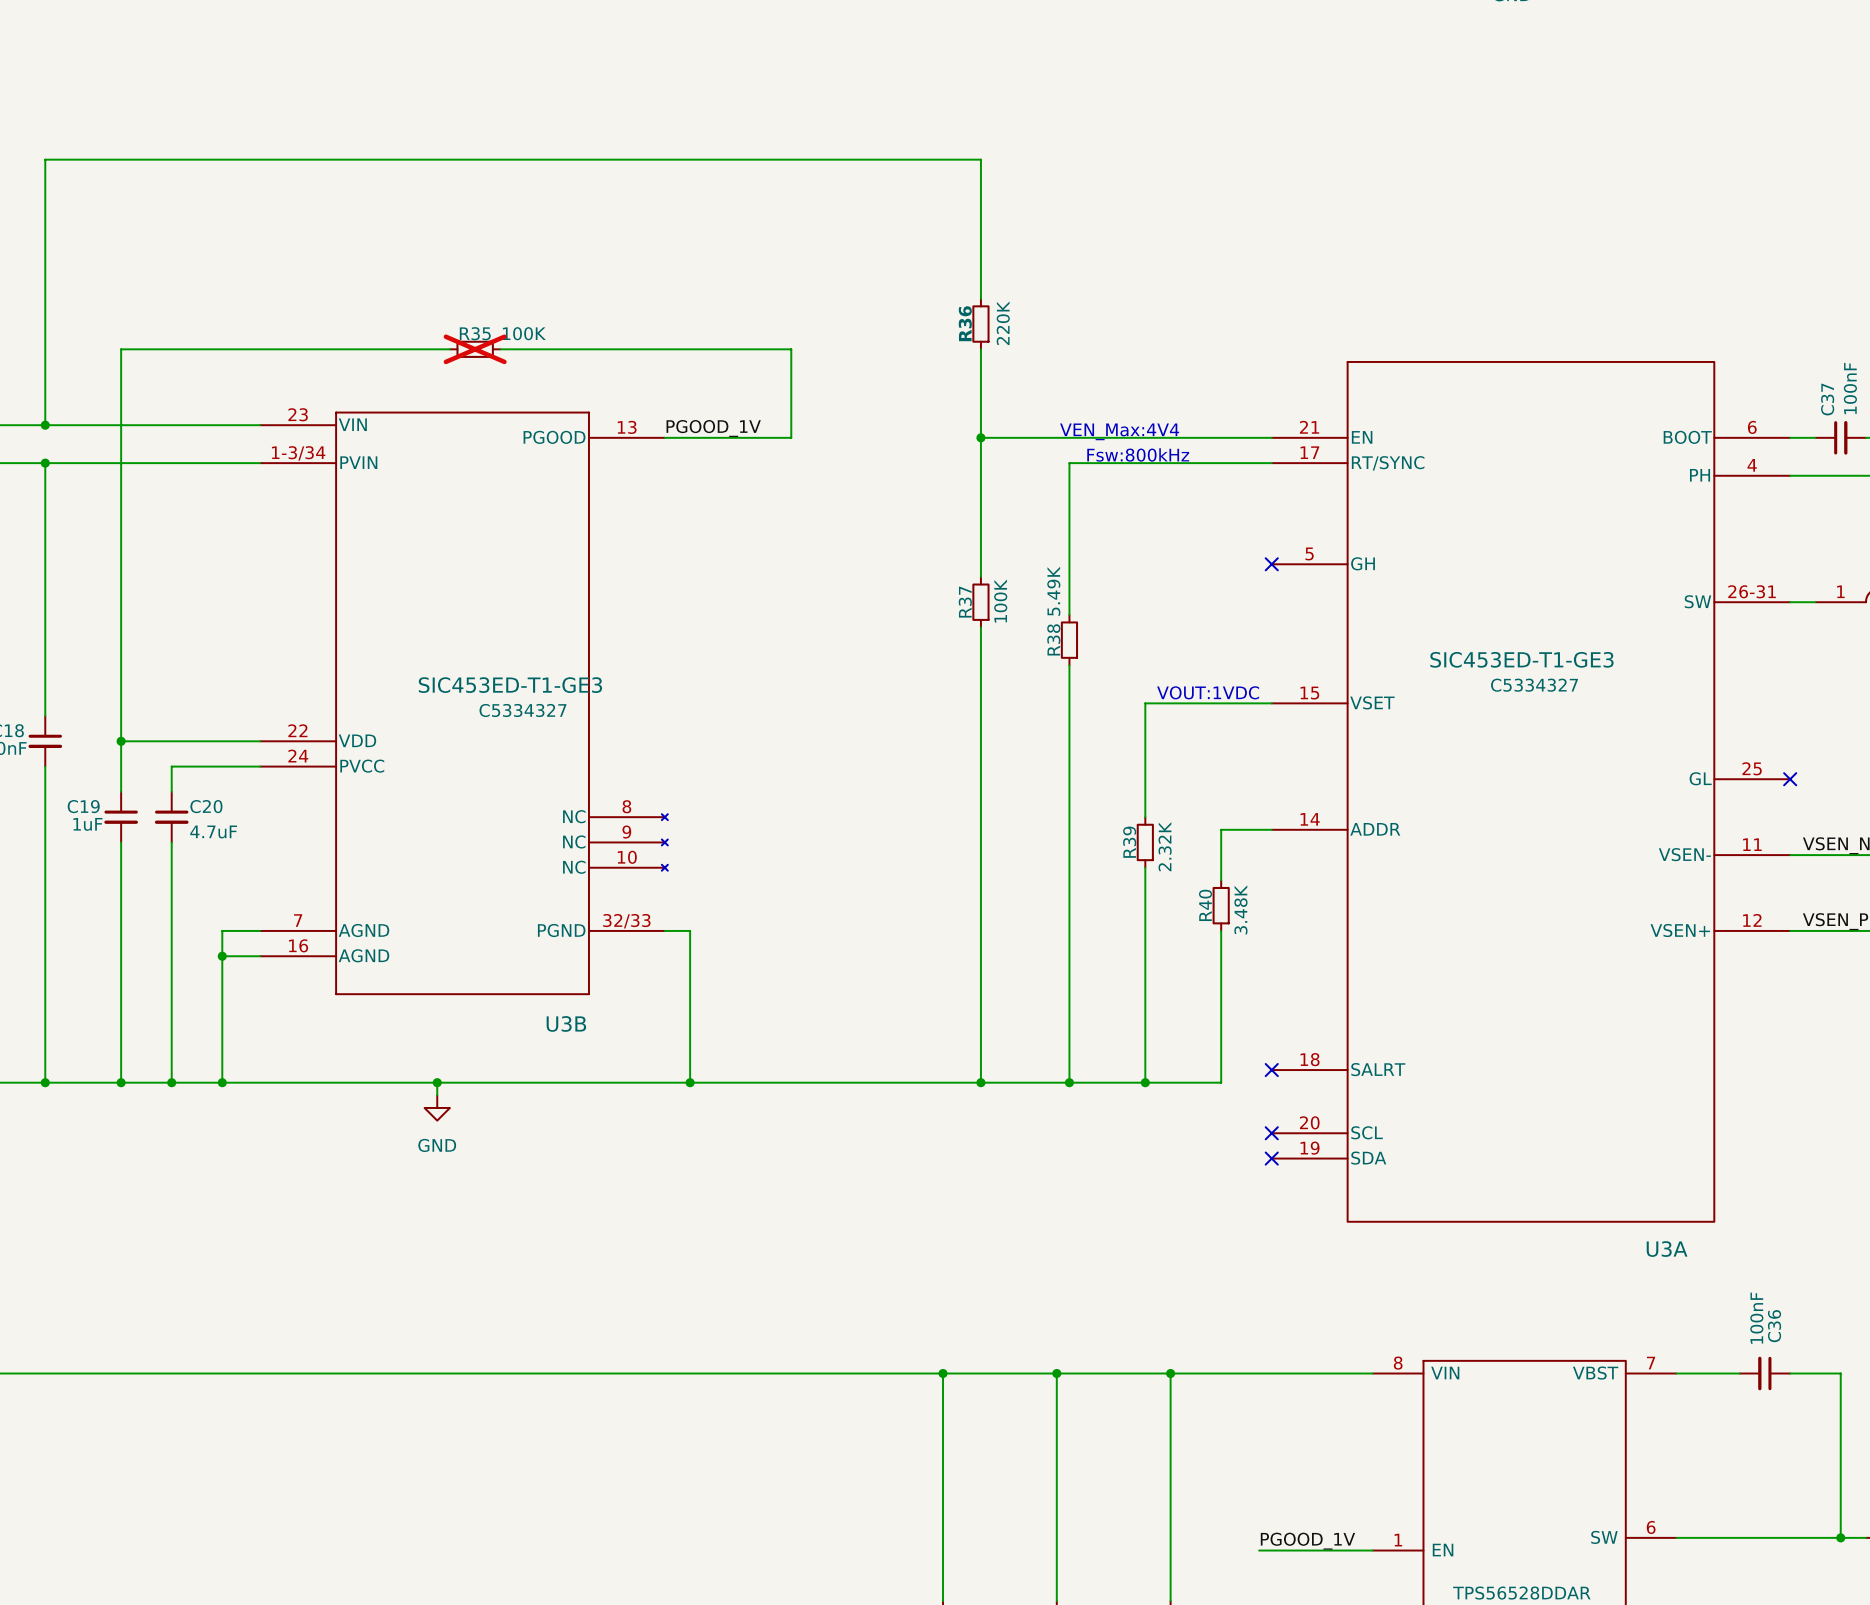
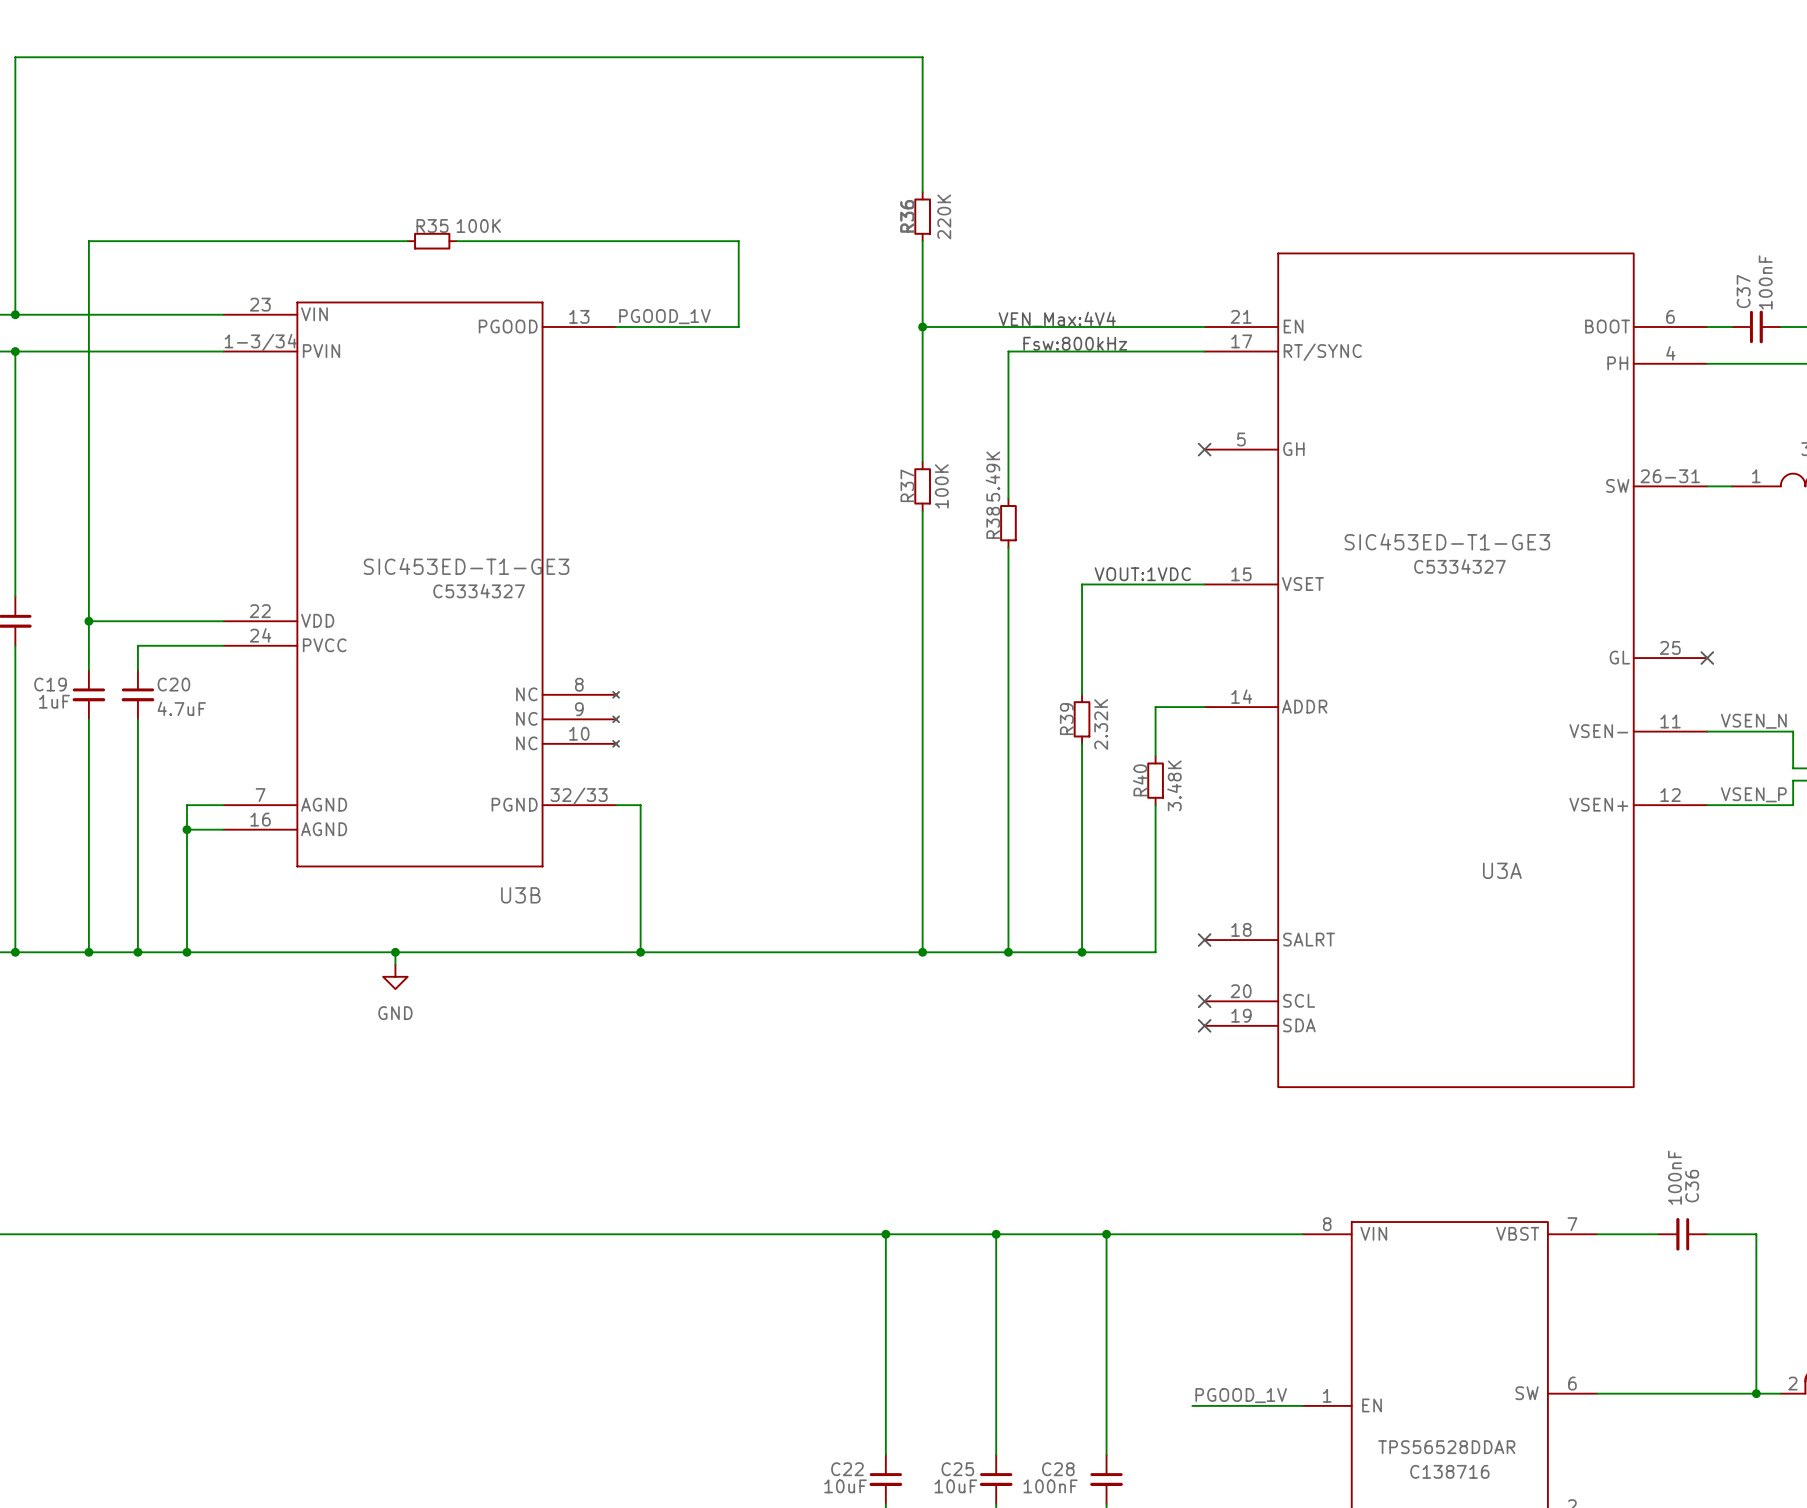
R35 do-not-place cross: (475, 349) -> none
U3A name position: U3A (1667, 1249) -> U3A (1502, 870)

